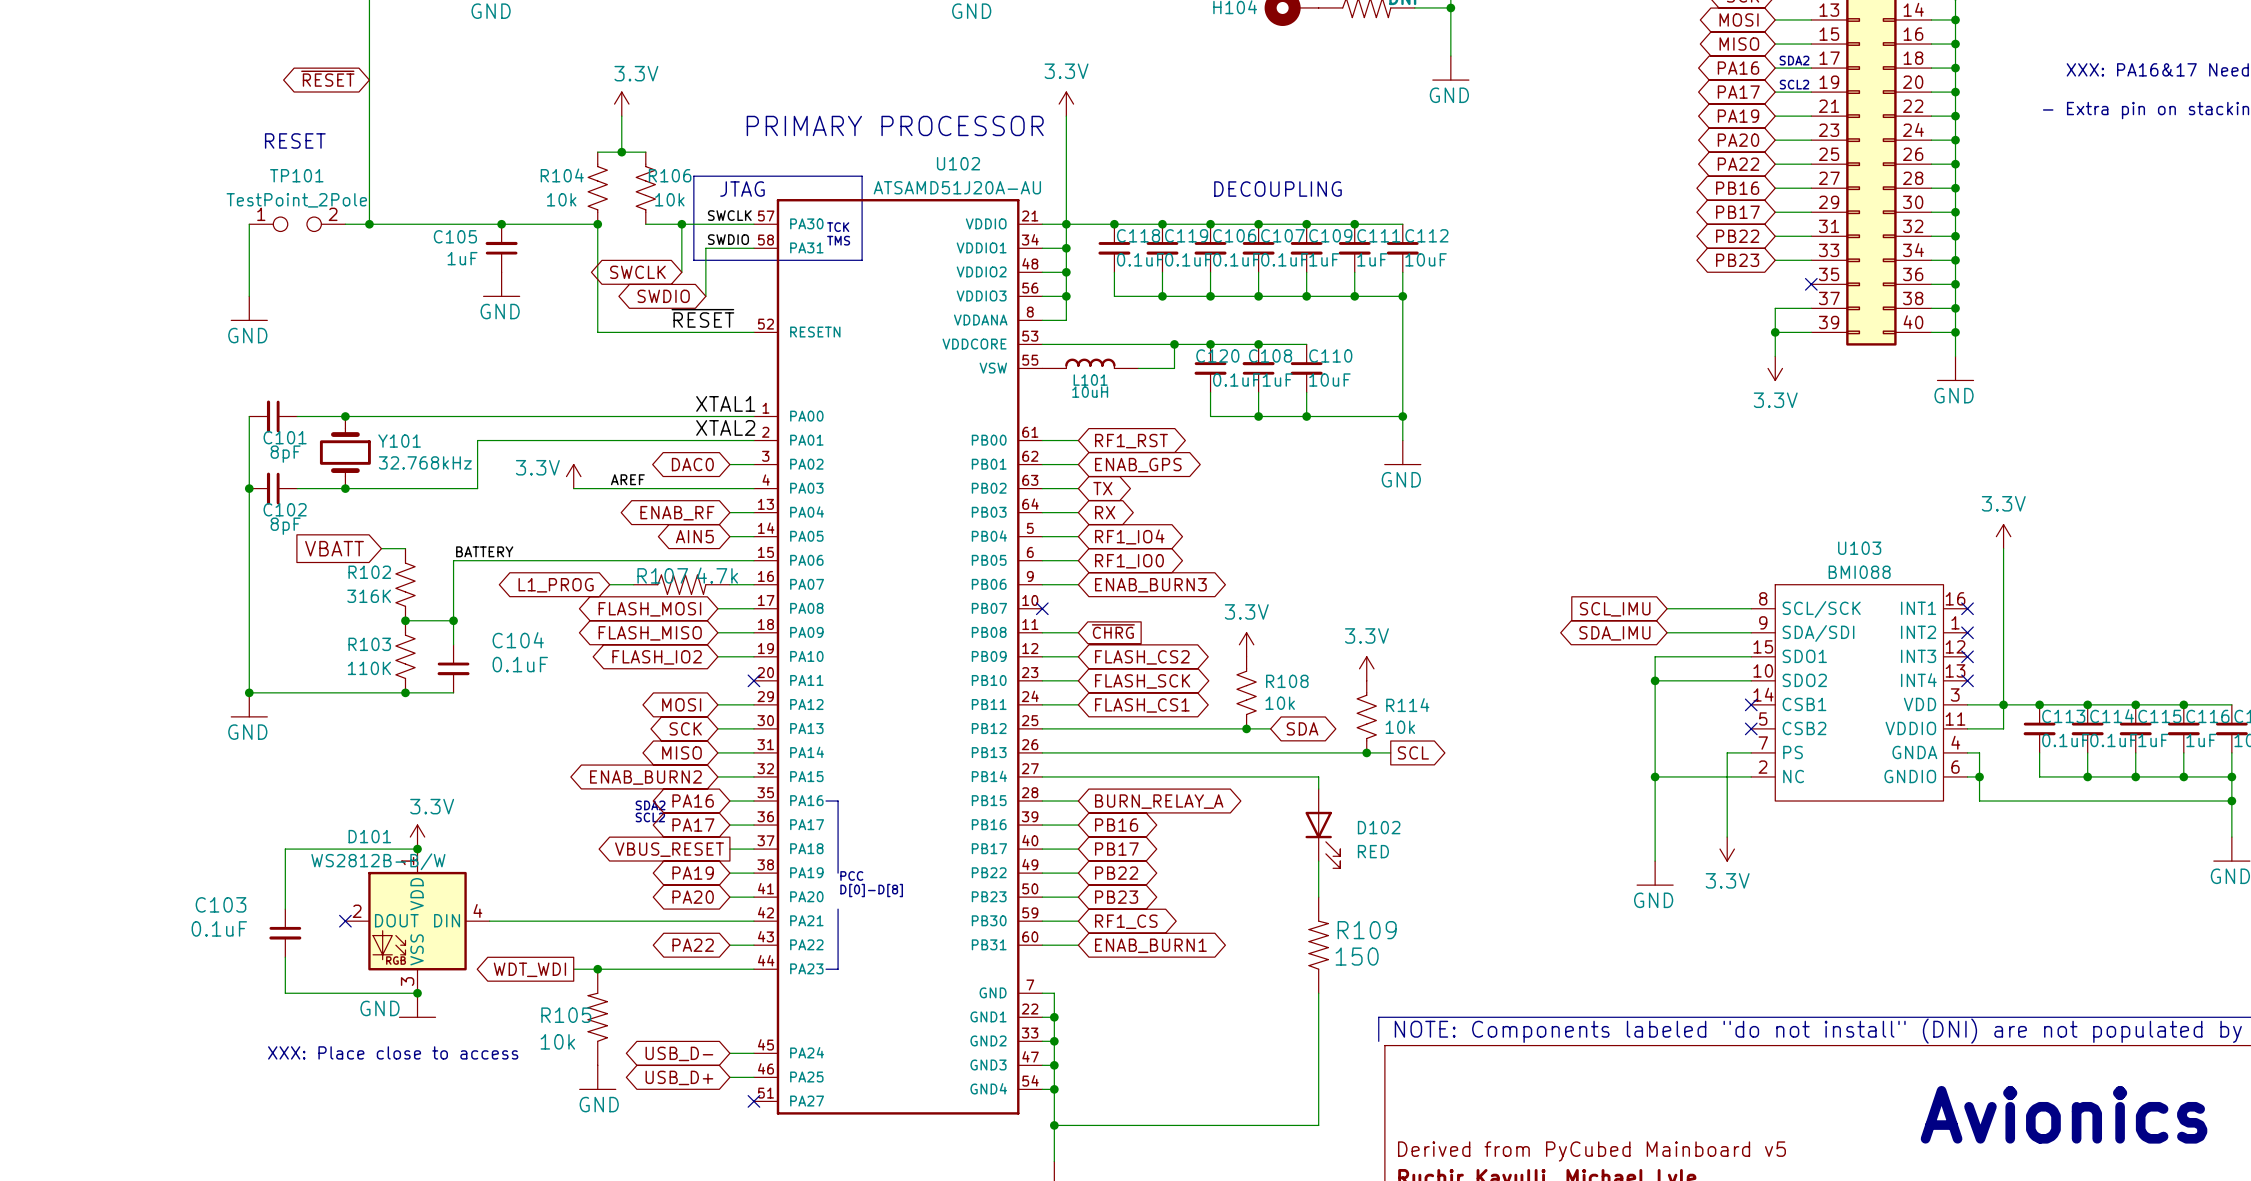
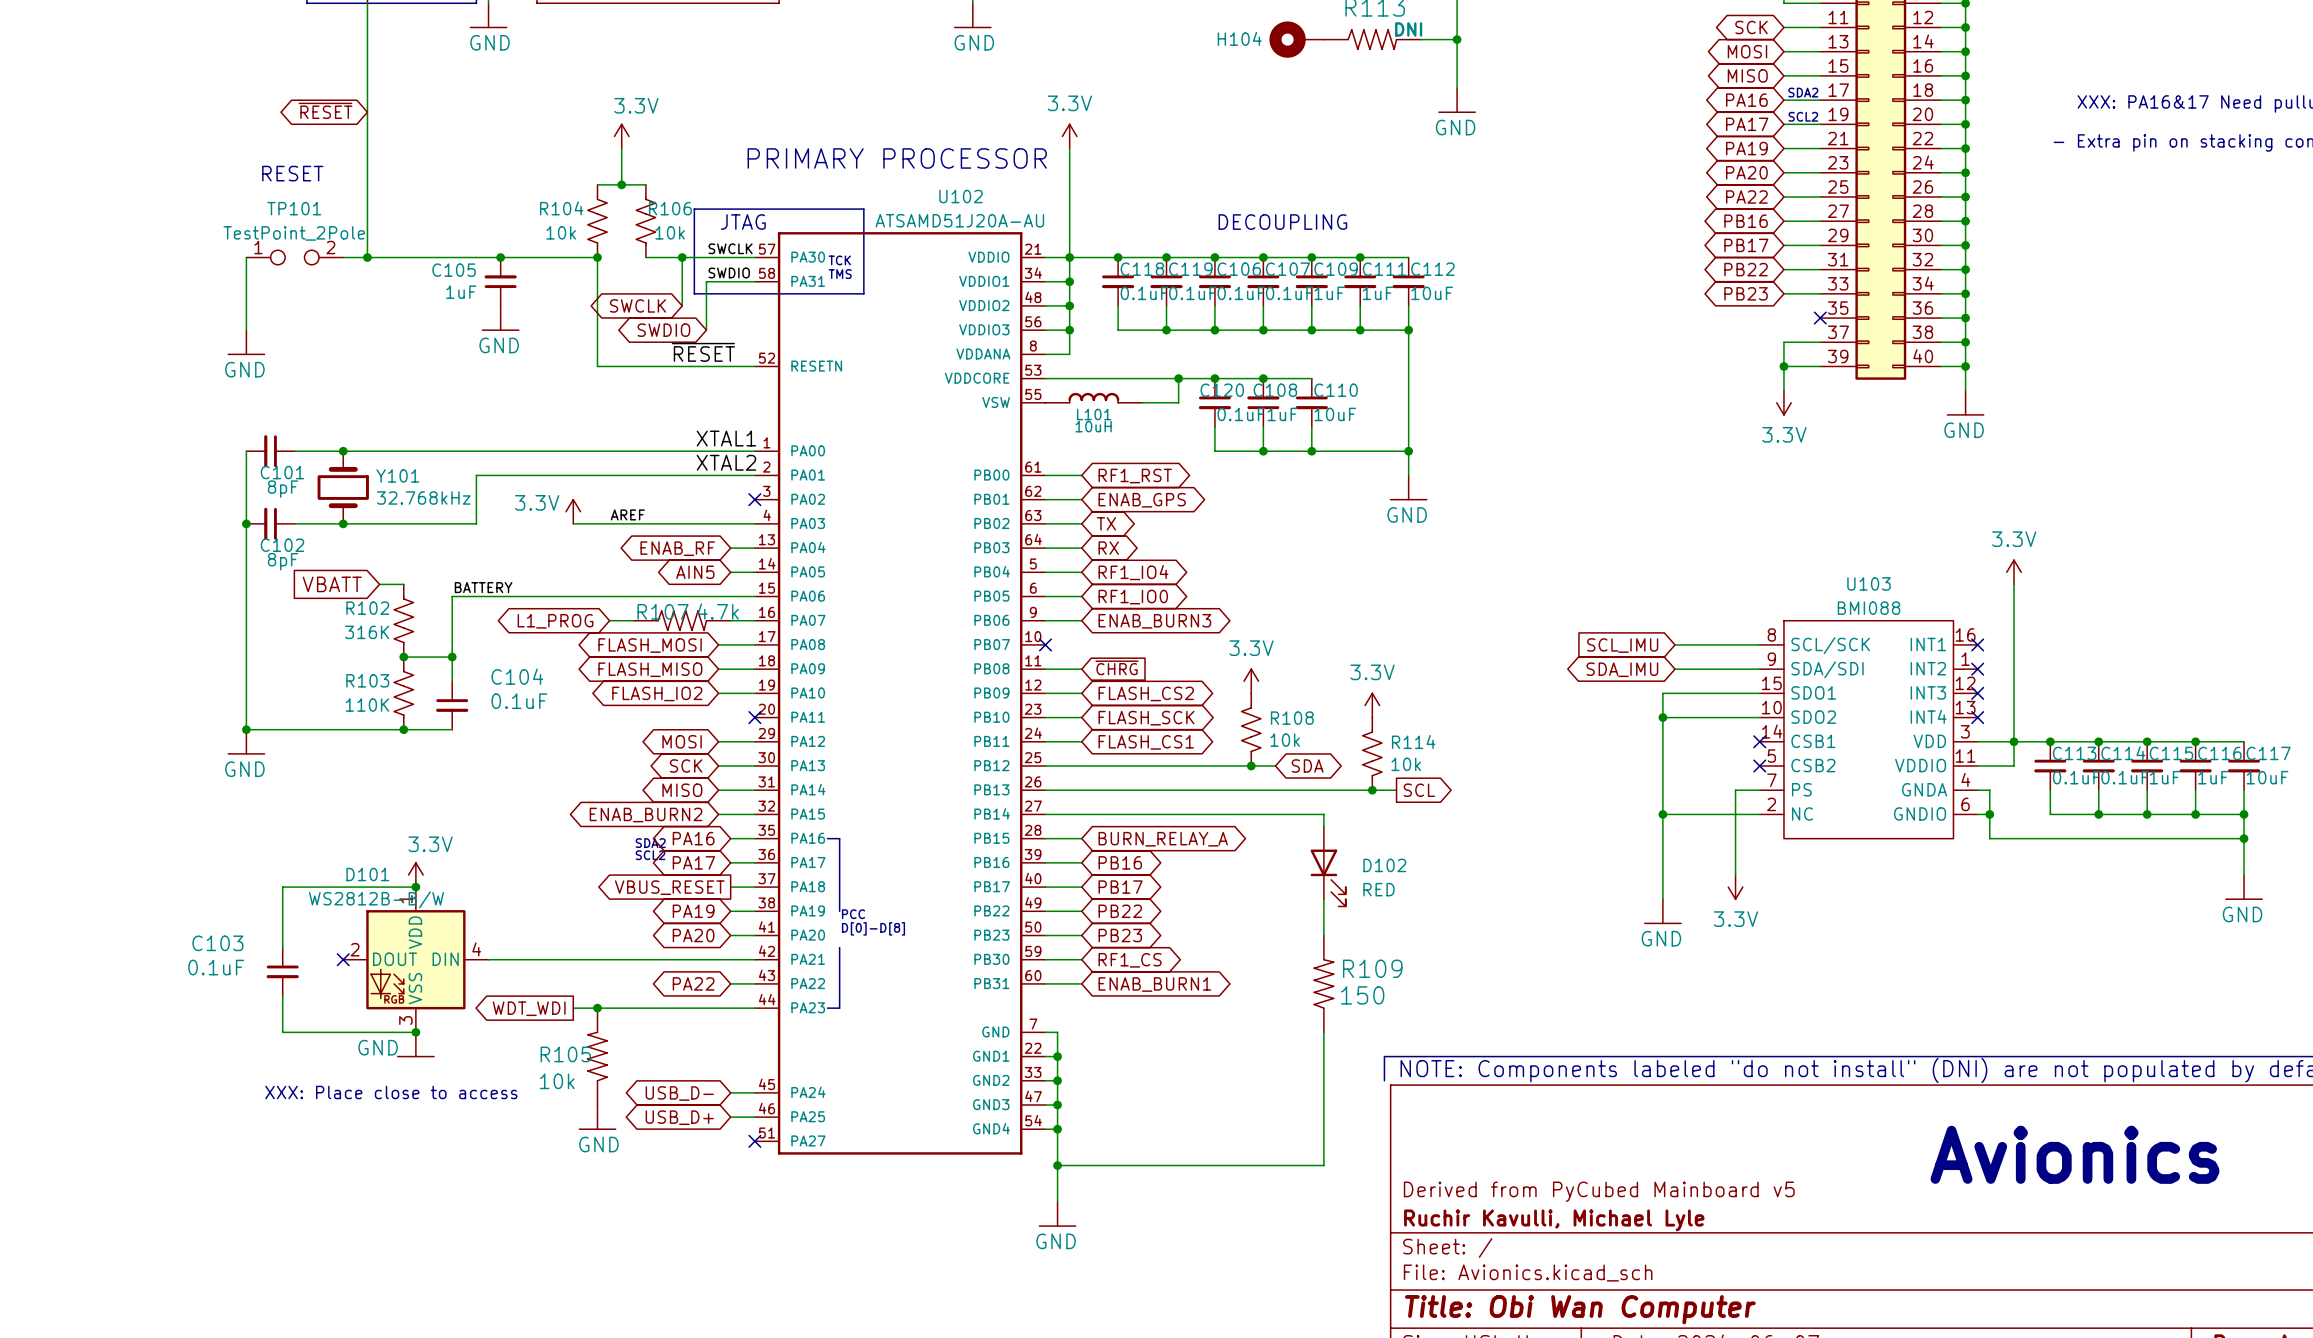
global label: DAC0 (692, 464) -> none
wire: (729, 464) (753, 464) -> none
no-connect mark: none -> (754, 499)

